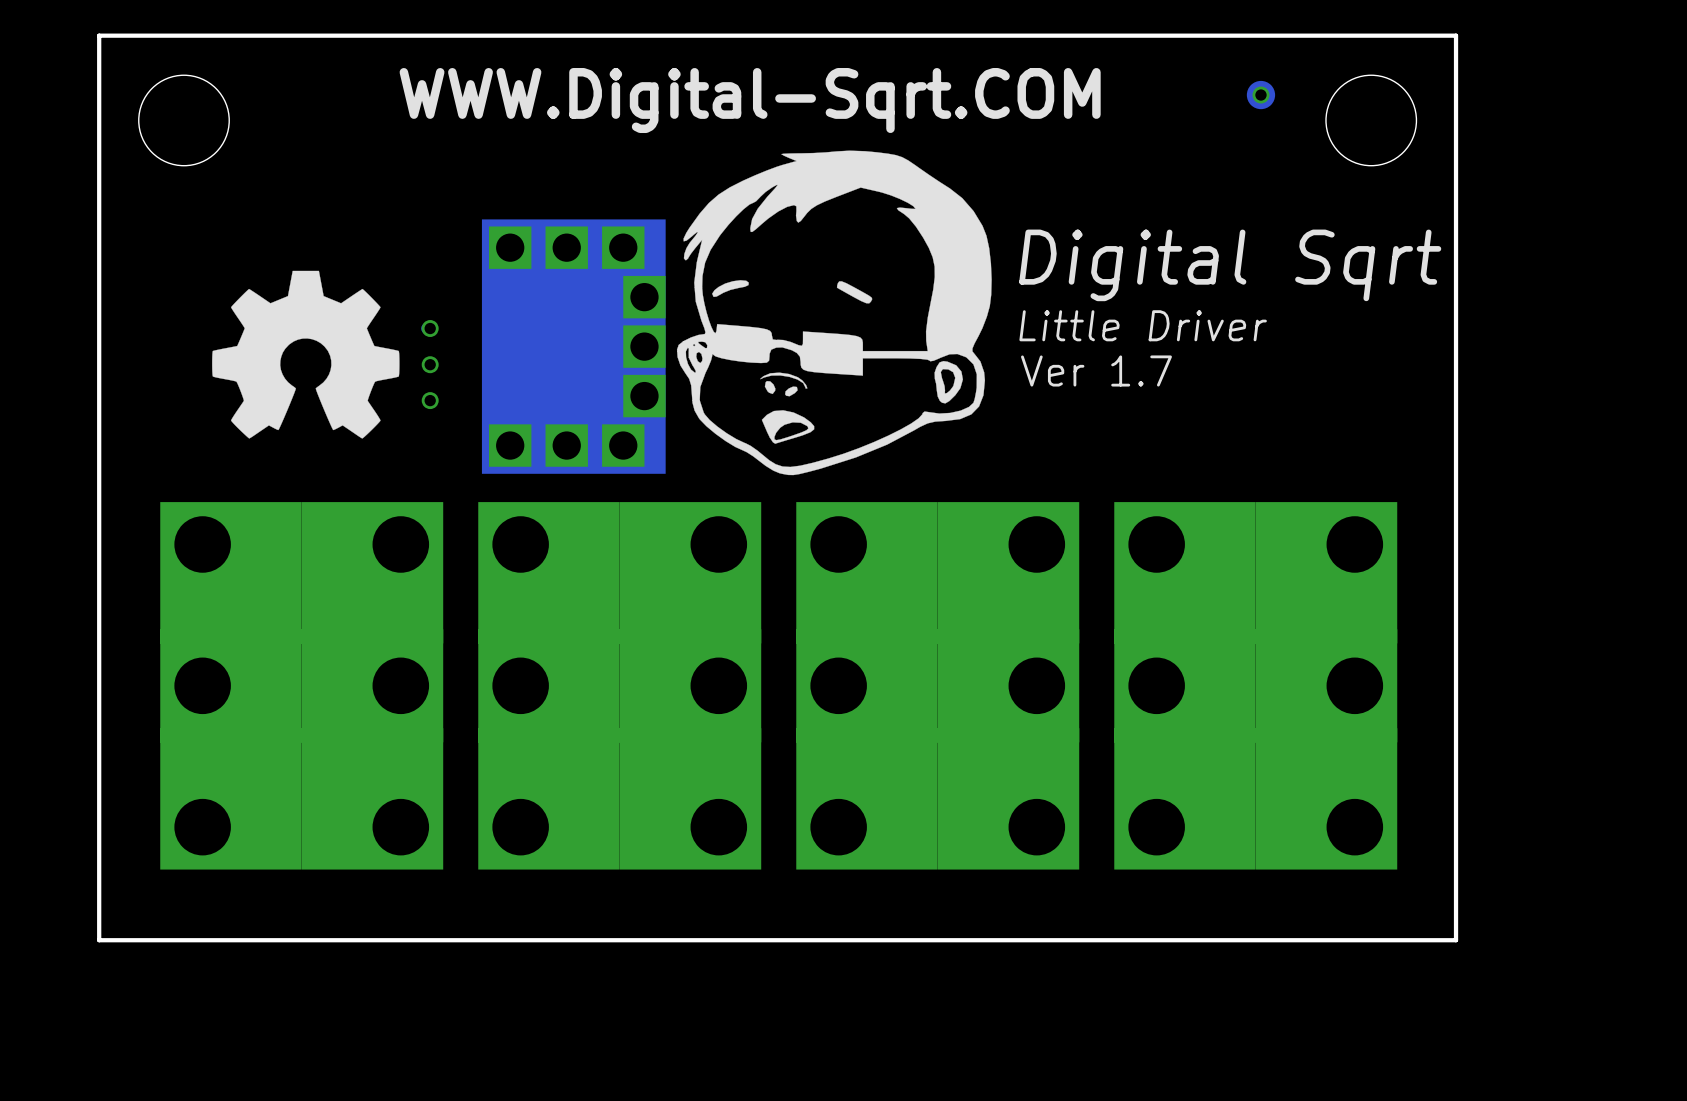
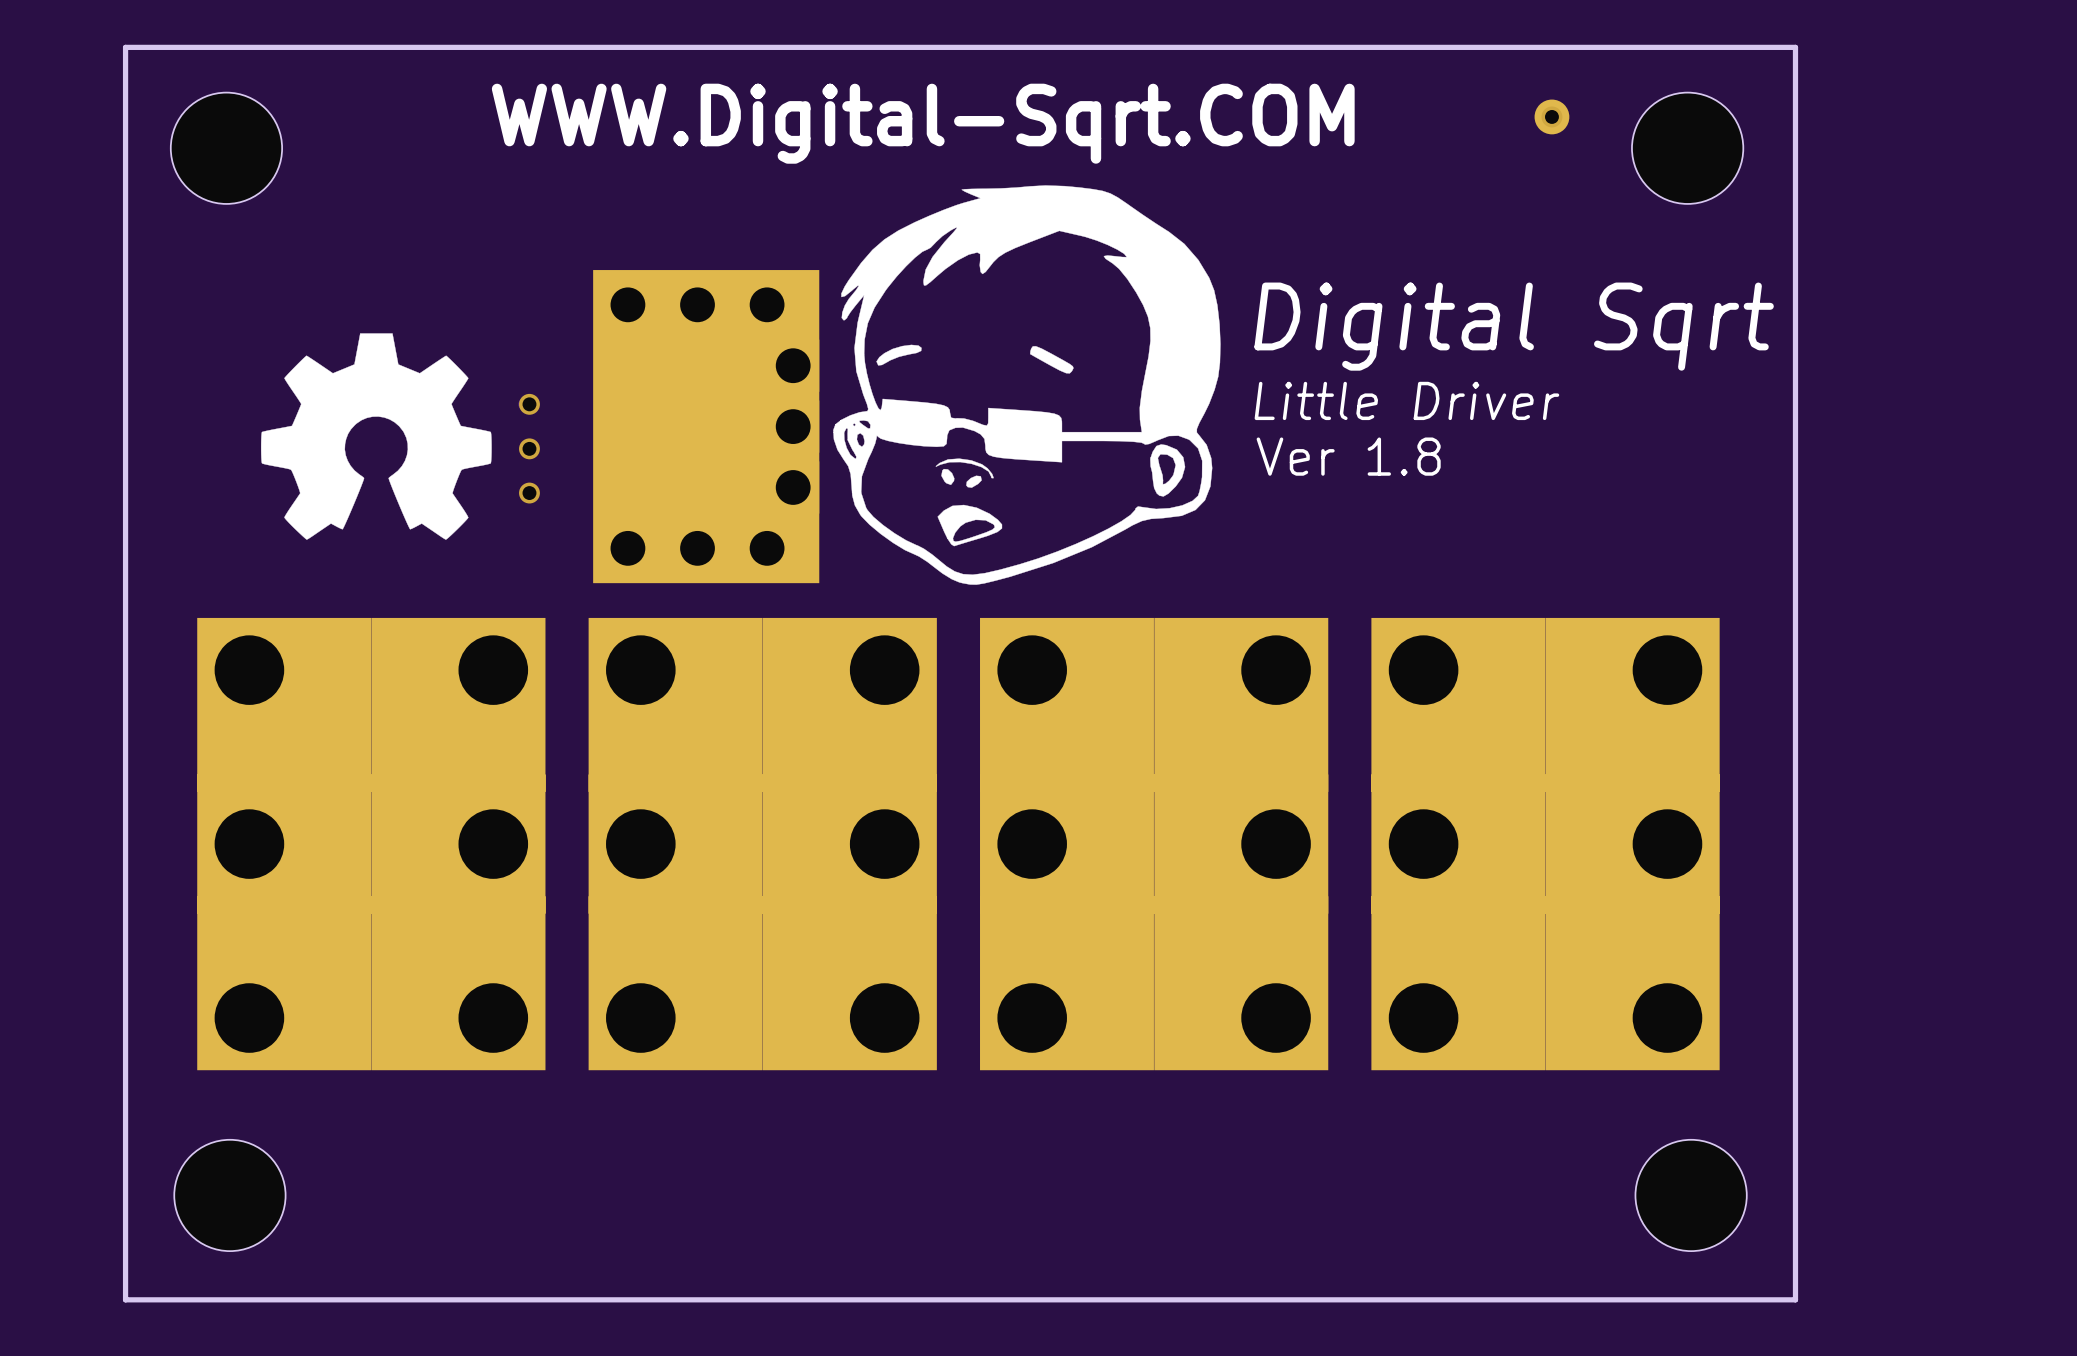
board edge: (1456, 35) (1456, 940) (99, 940) (99, 35) (1456, 35) -> (1795, 47) (1795, 1299) (125, 1299) (125, 47) (1795, 47)
text: Ver 1.7 (1096, 370) -> Ver 1.8 (1348, 456)
part: none -> (229, 1195)
part: none -> (1691, 1195)

